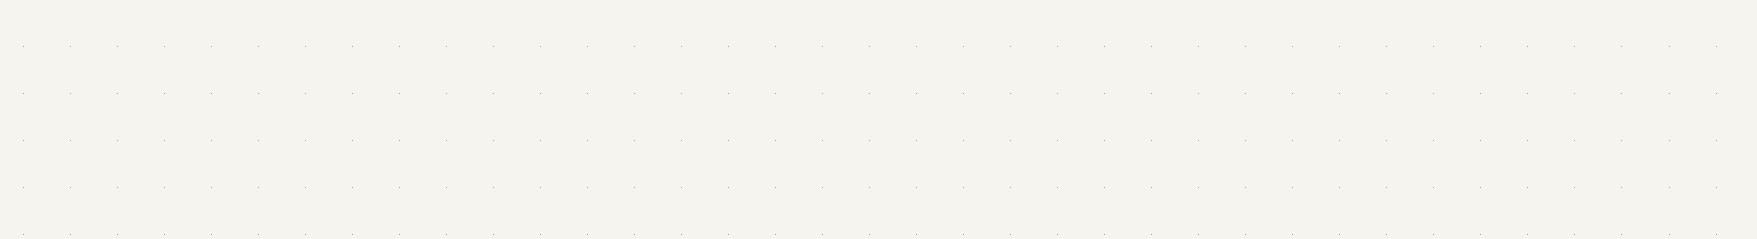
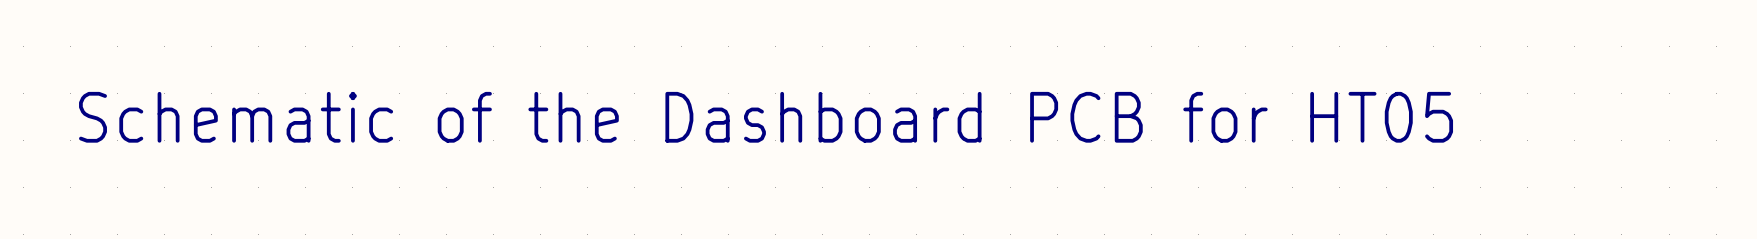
text: none -> Schematic of the Dashboard PCB for HT05 (766, 117)

